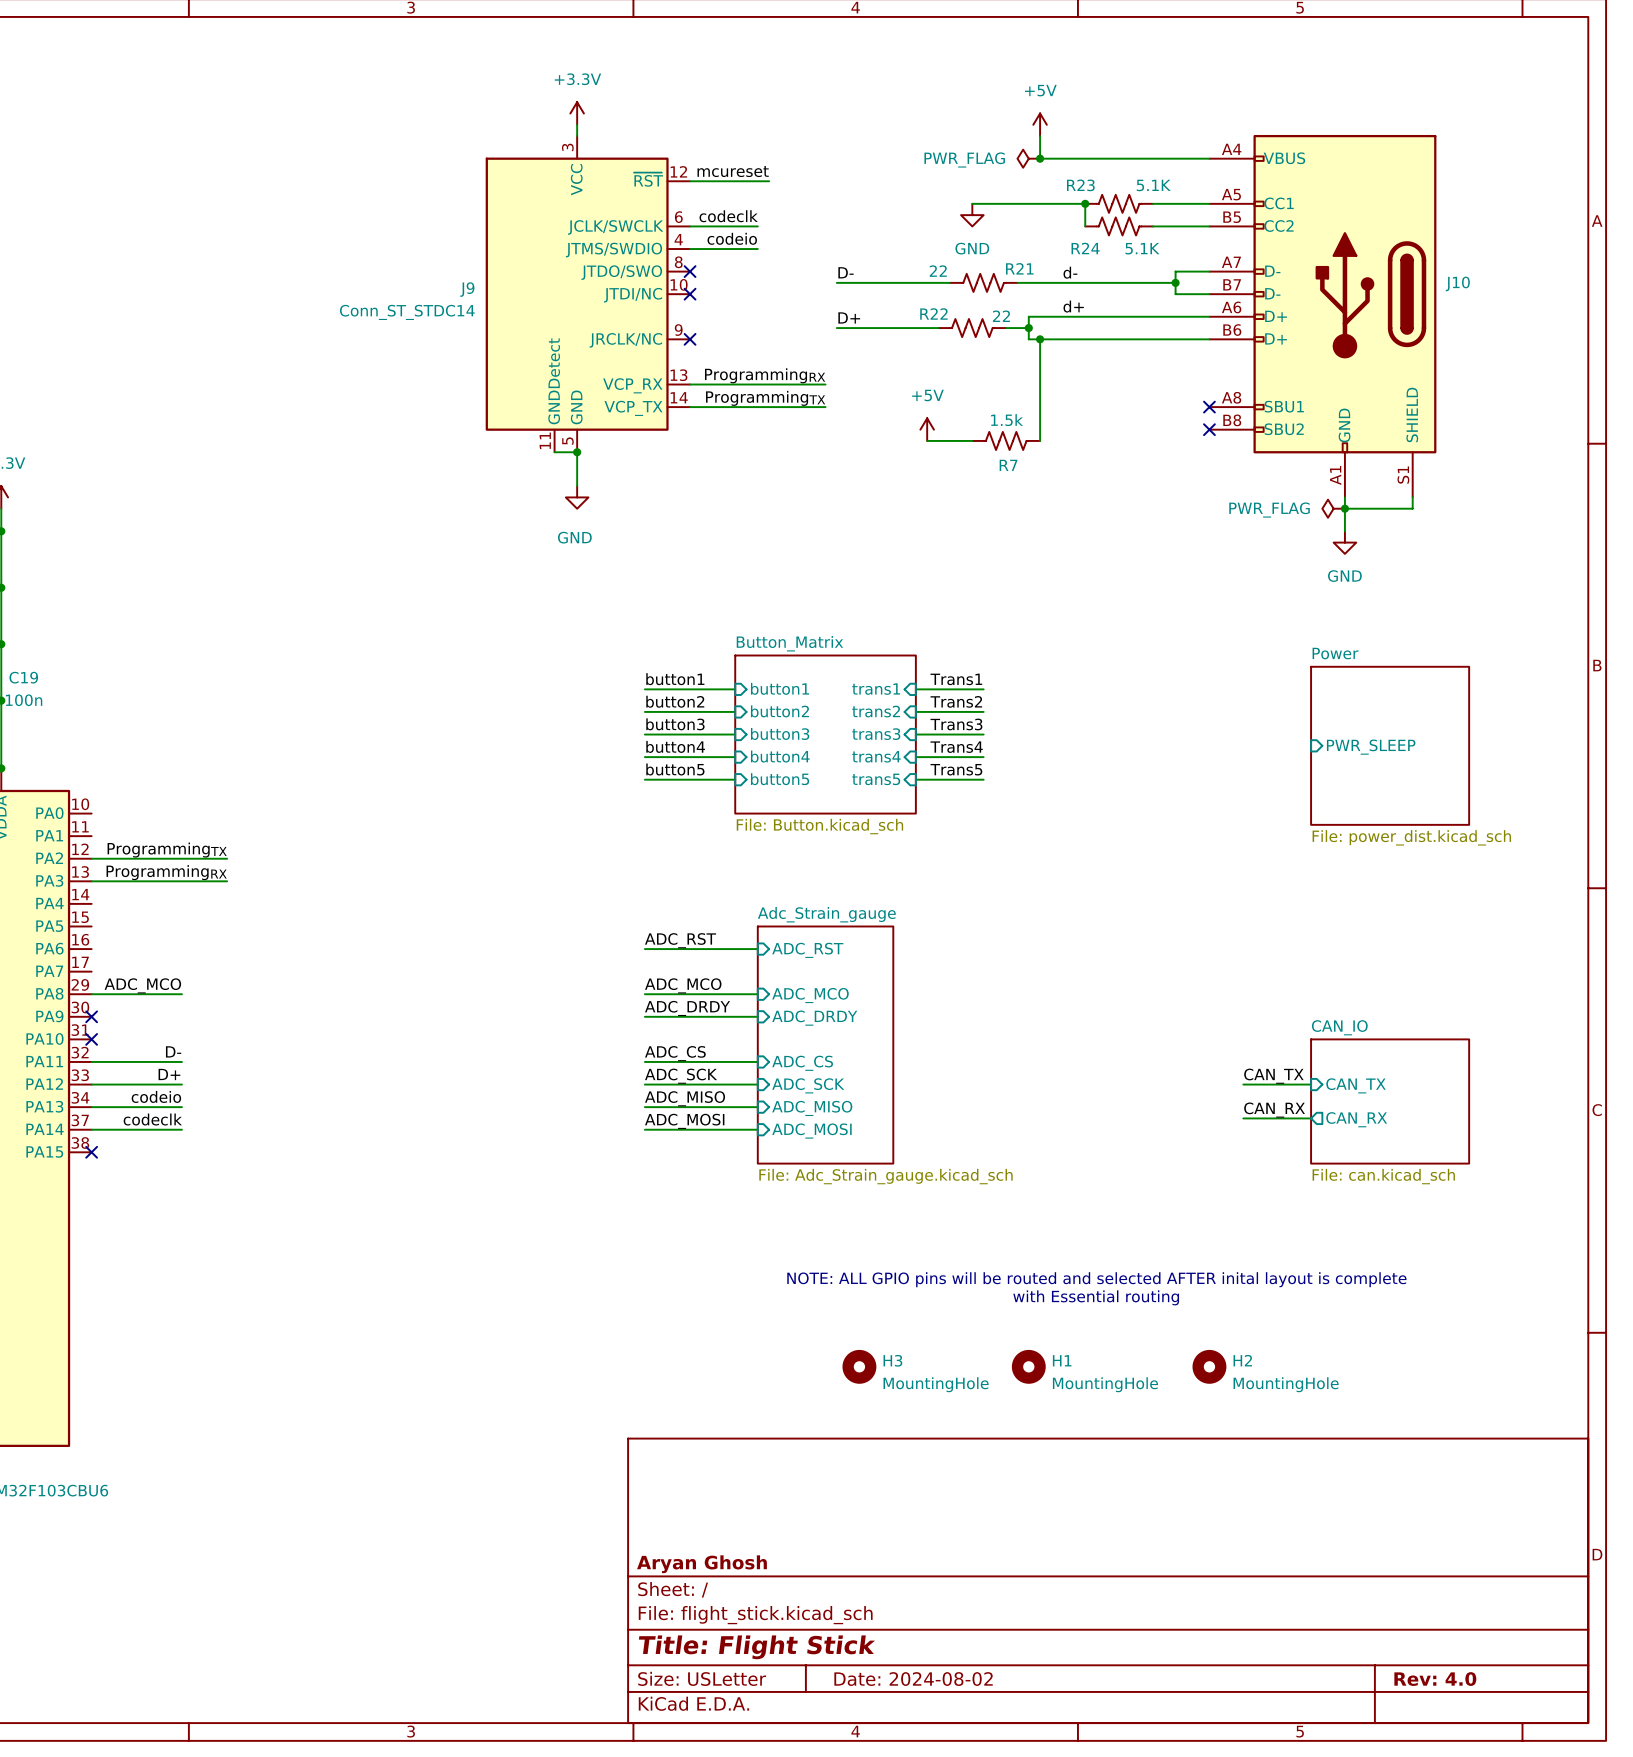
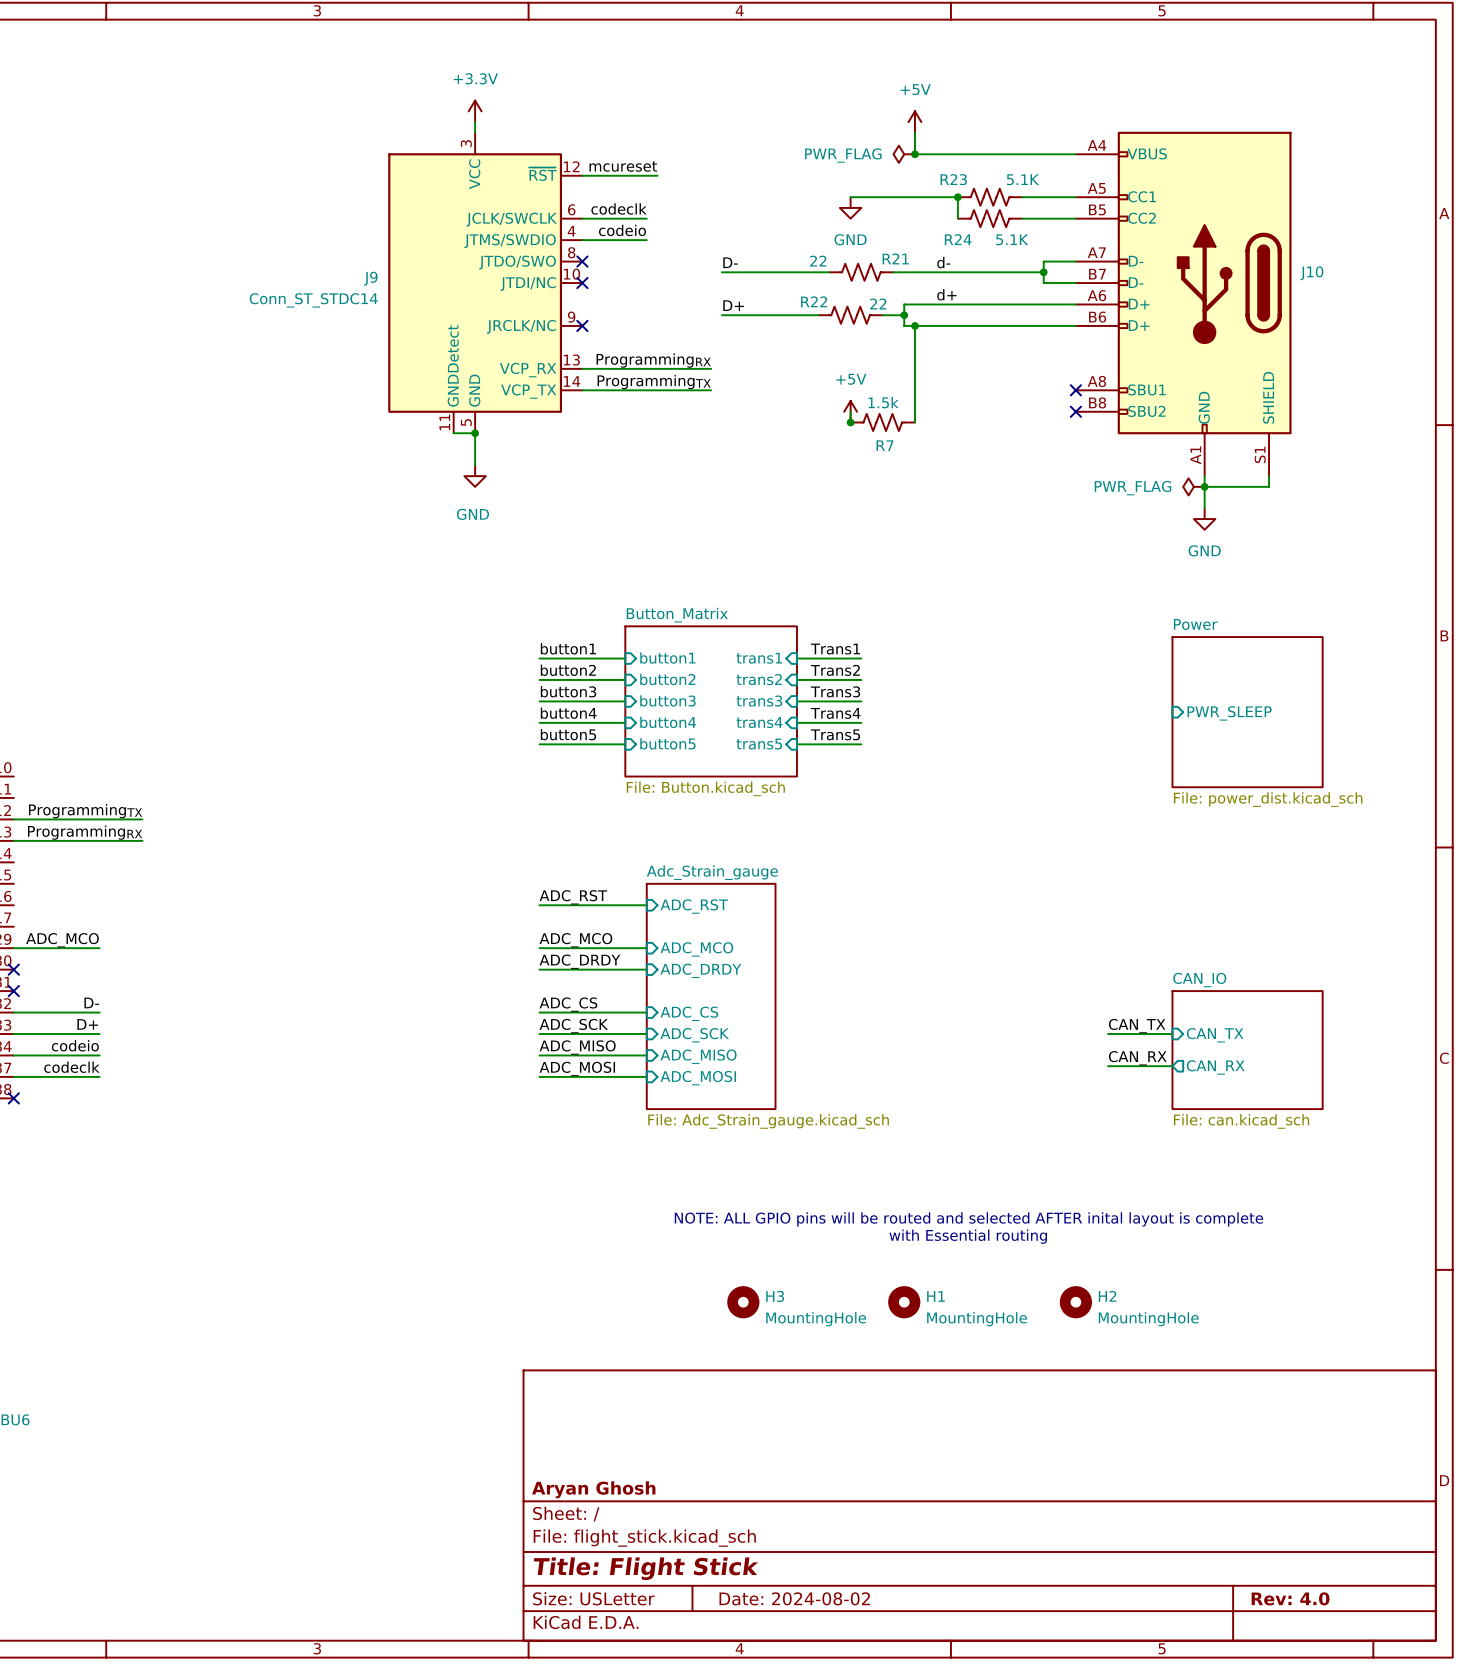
power symbol position: +5V (927, 429) -> +5V (850, 411)
wire: (927, 440) (972, 440) -> (850, 411) (850, 422)
junction: none -> (850, 422)

